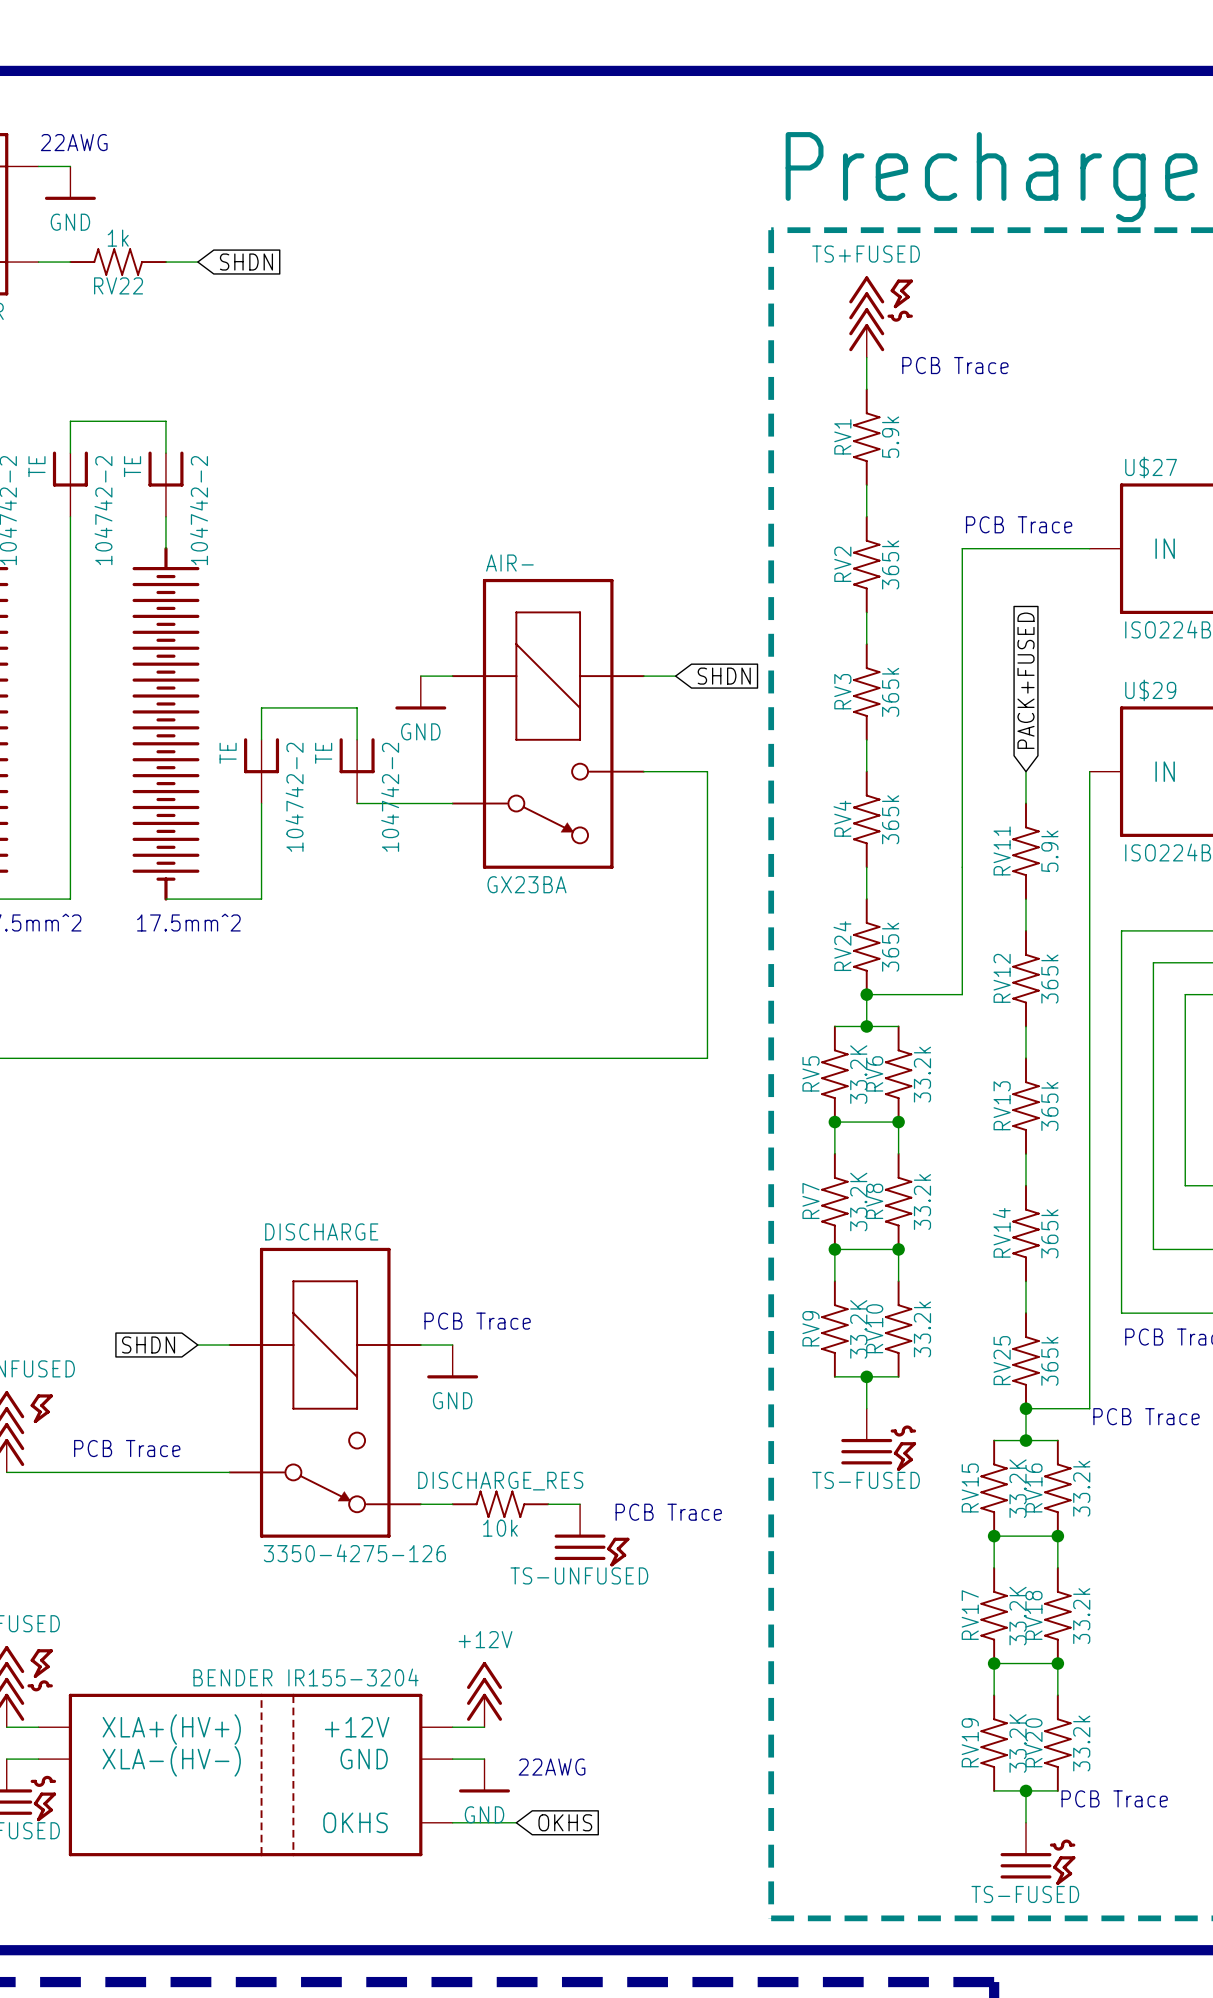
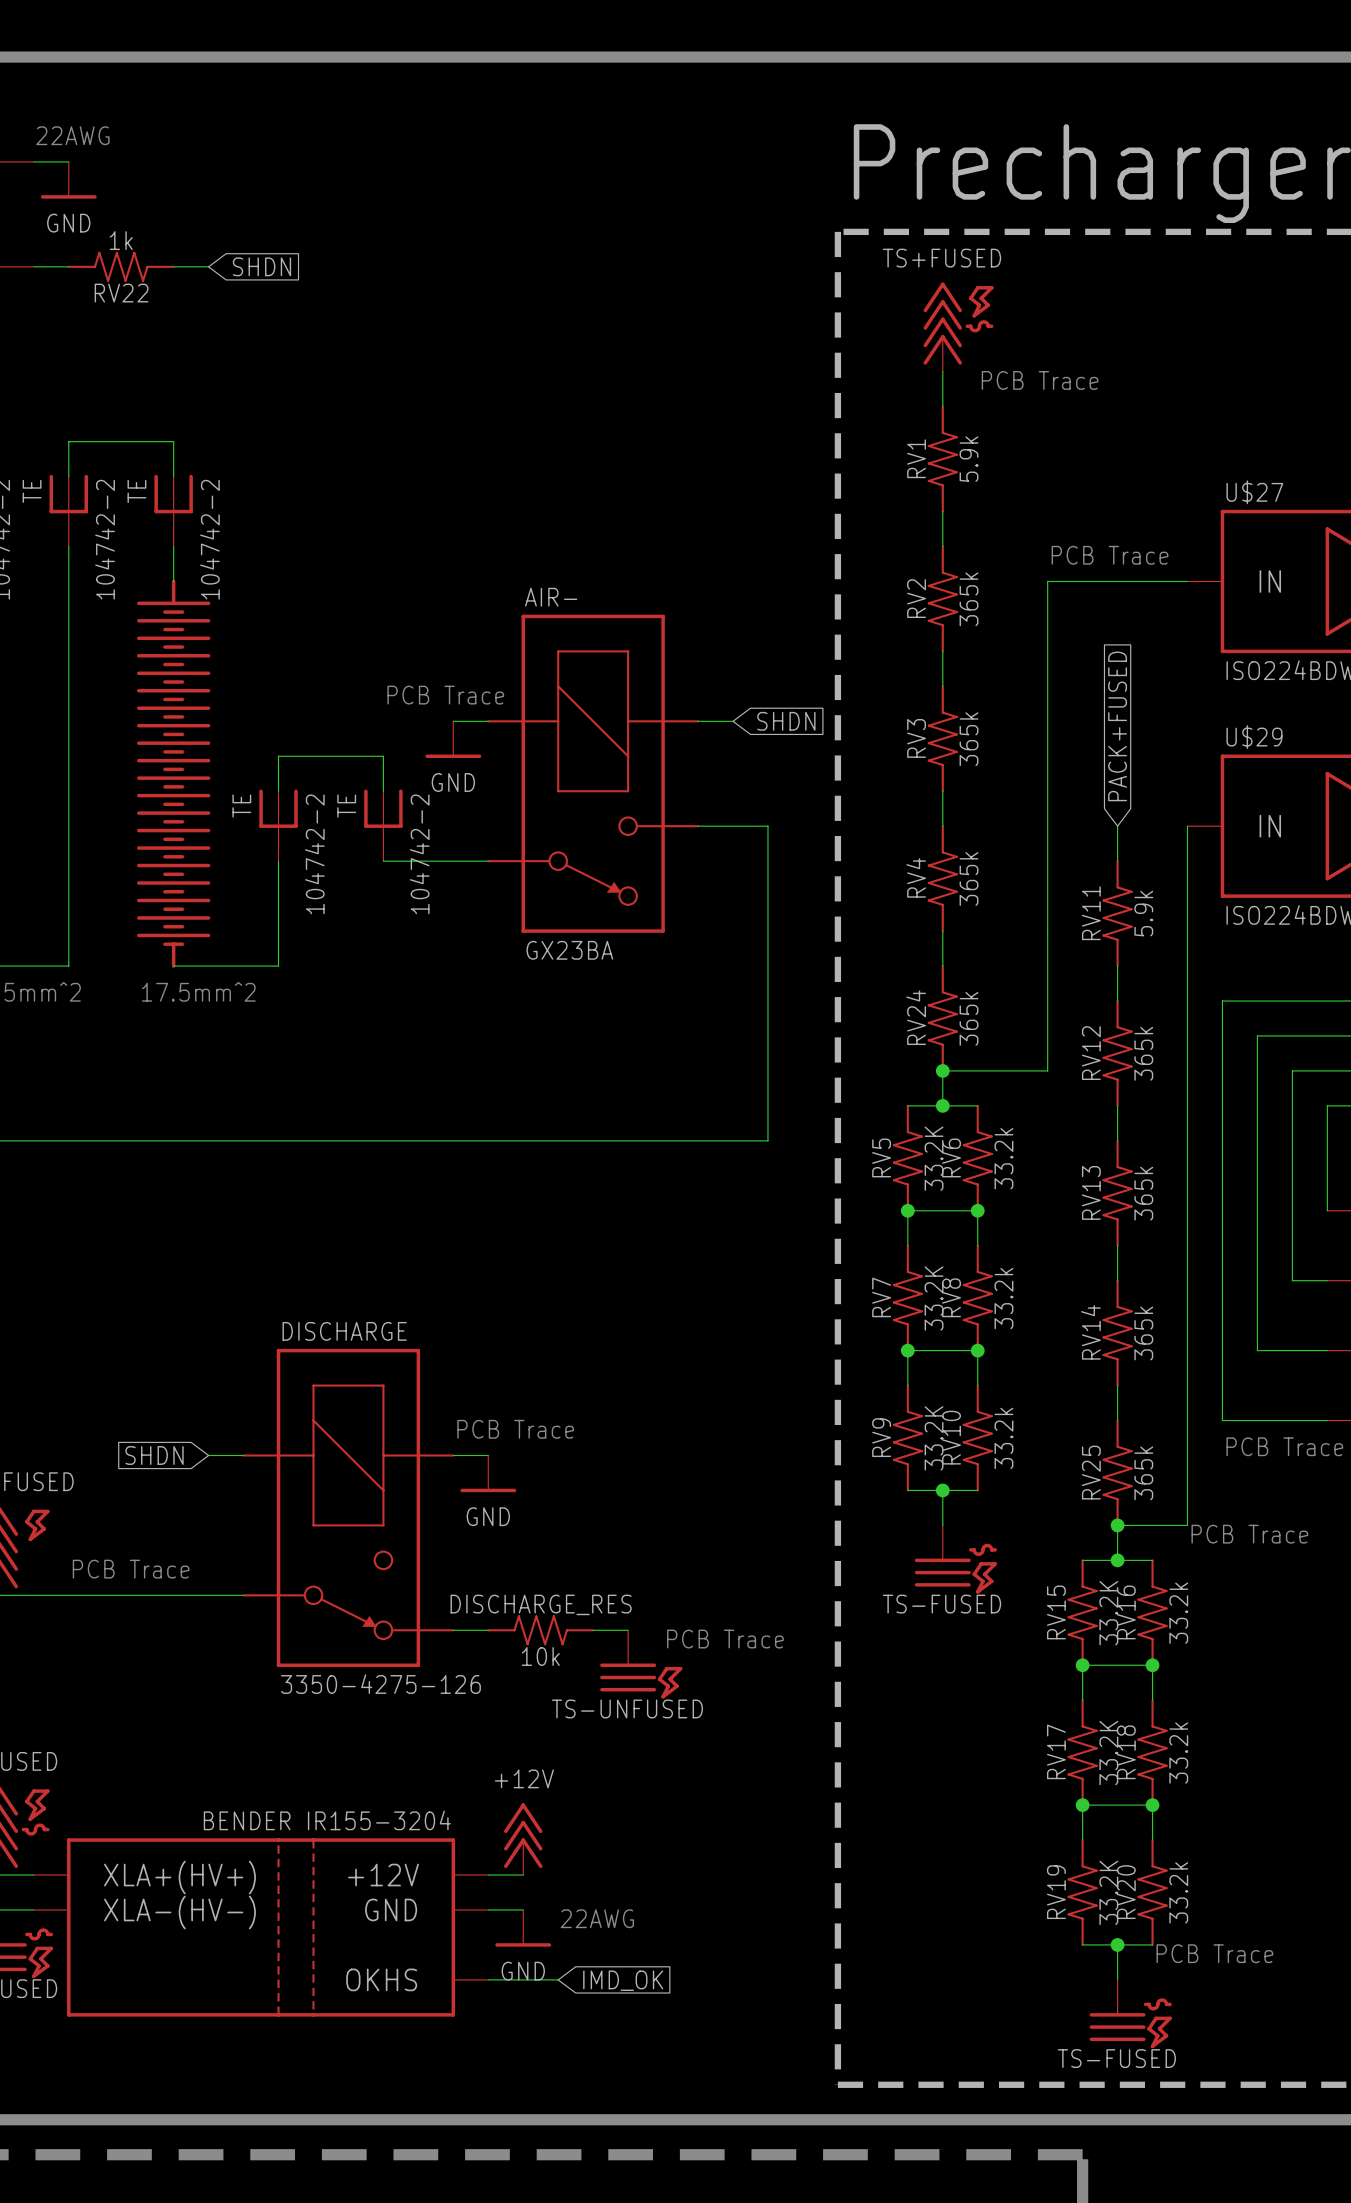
text: none -> PCB Trace (445, 695)
global label: OKHS (565, 1822) -> IMD_OK (623, 1980)

